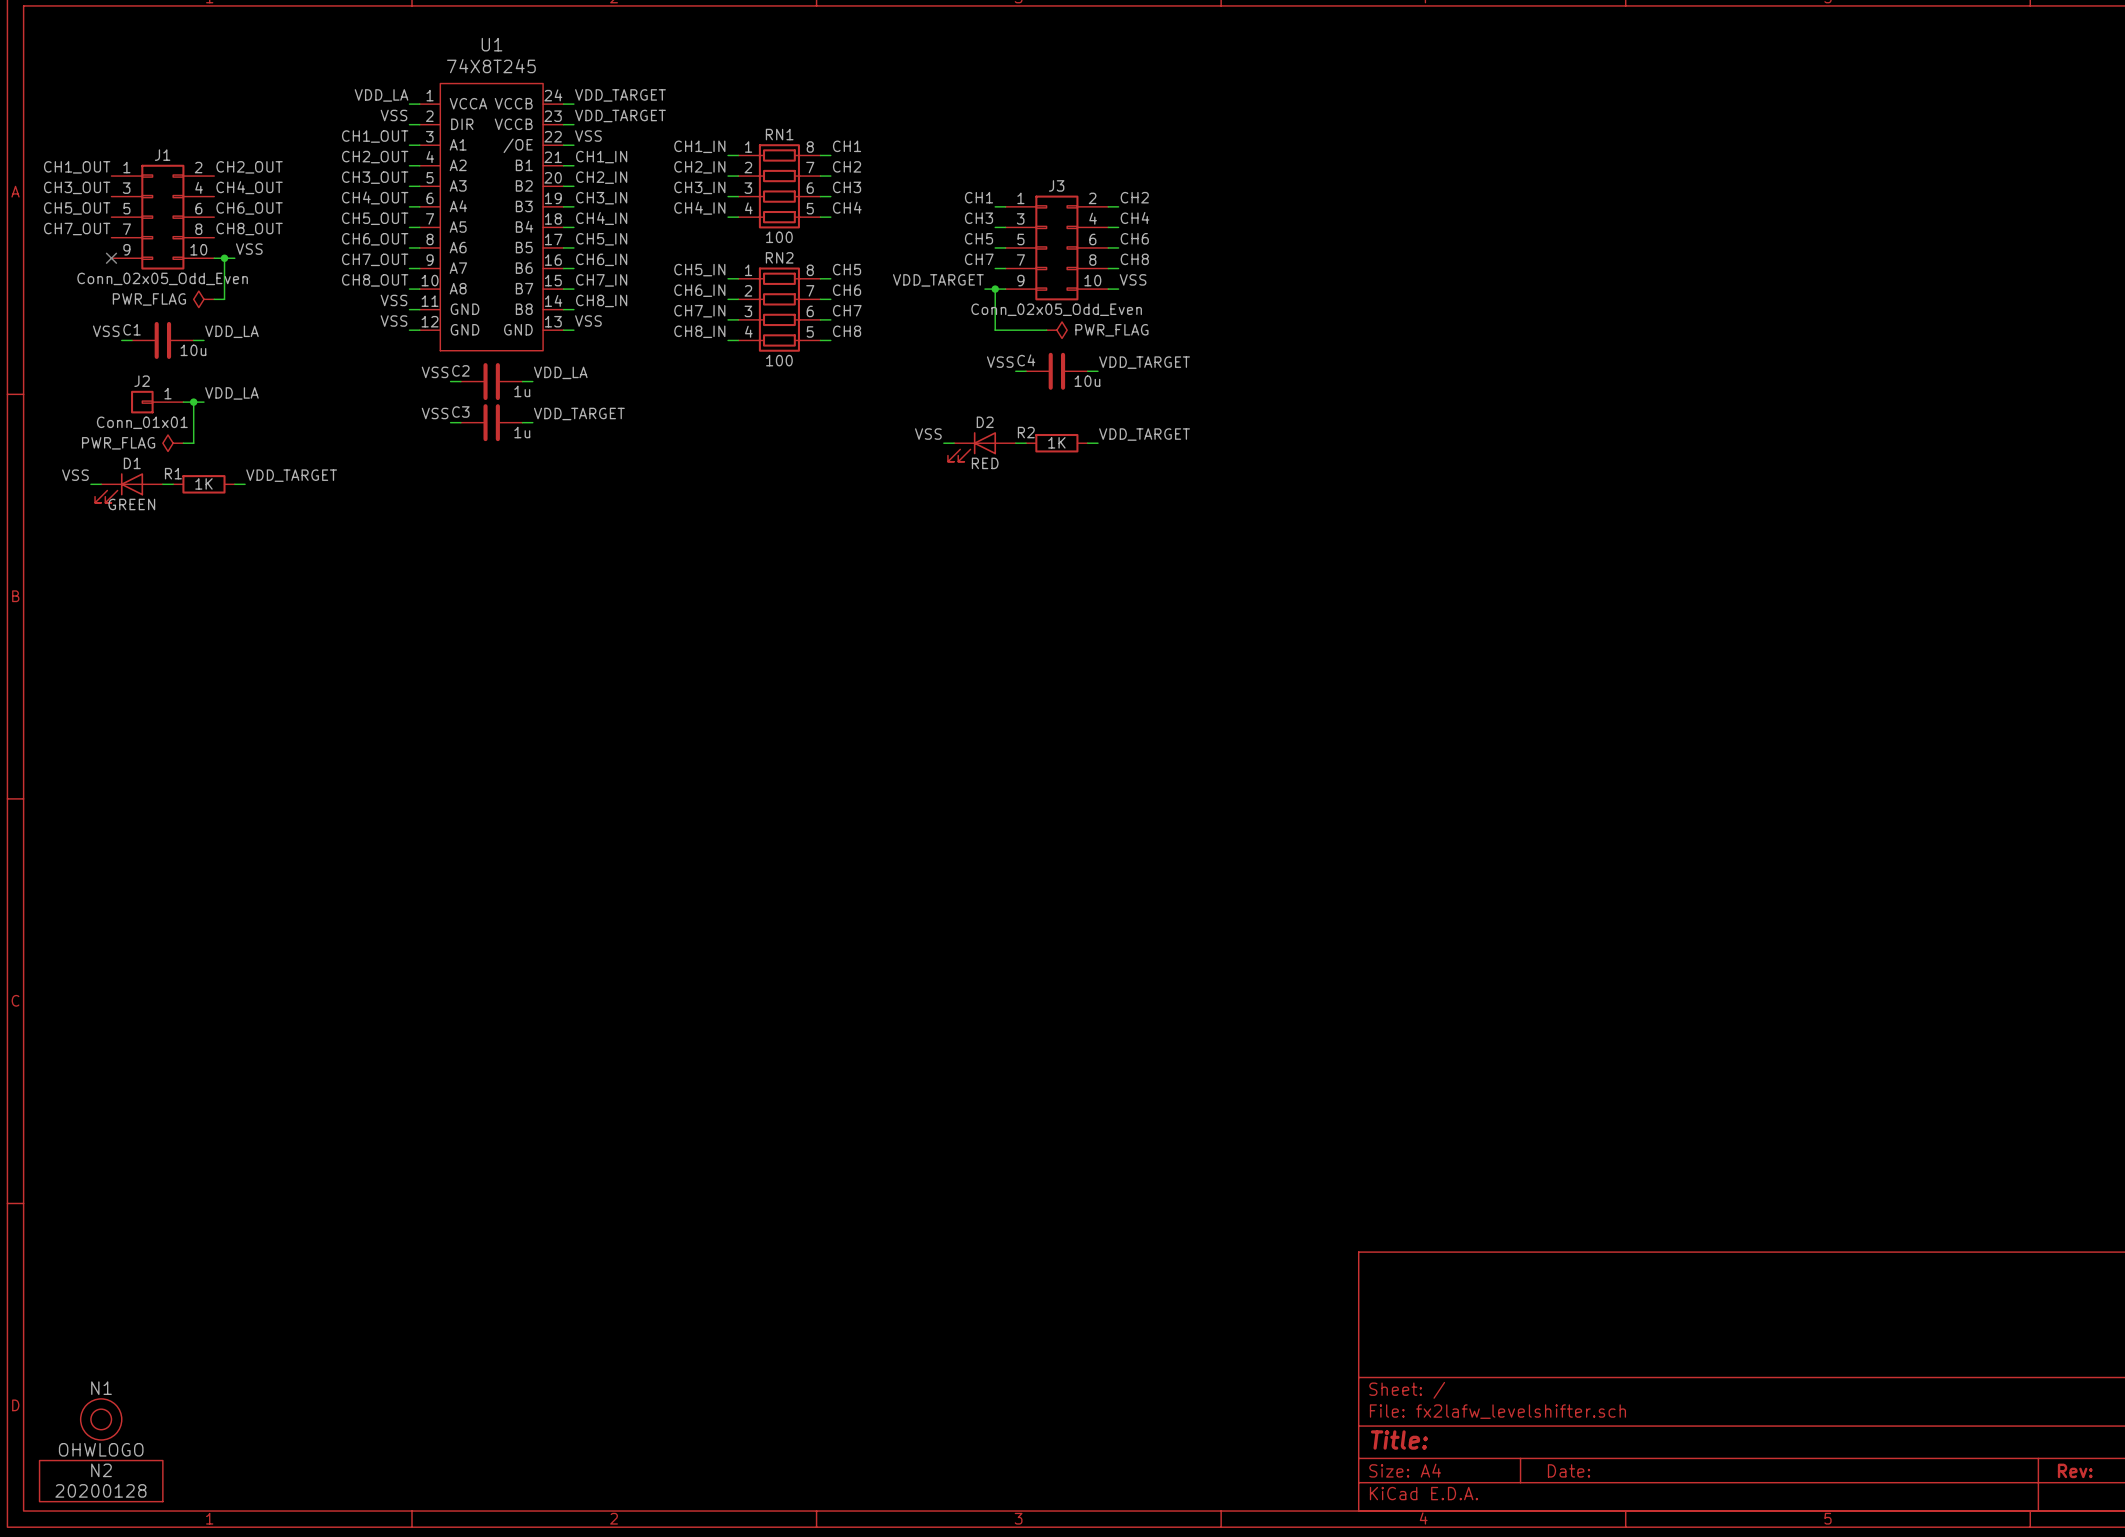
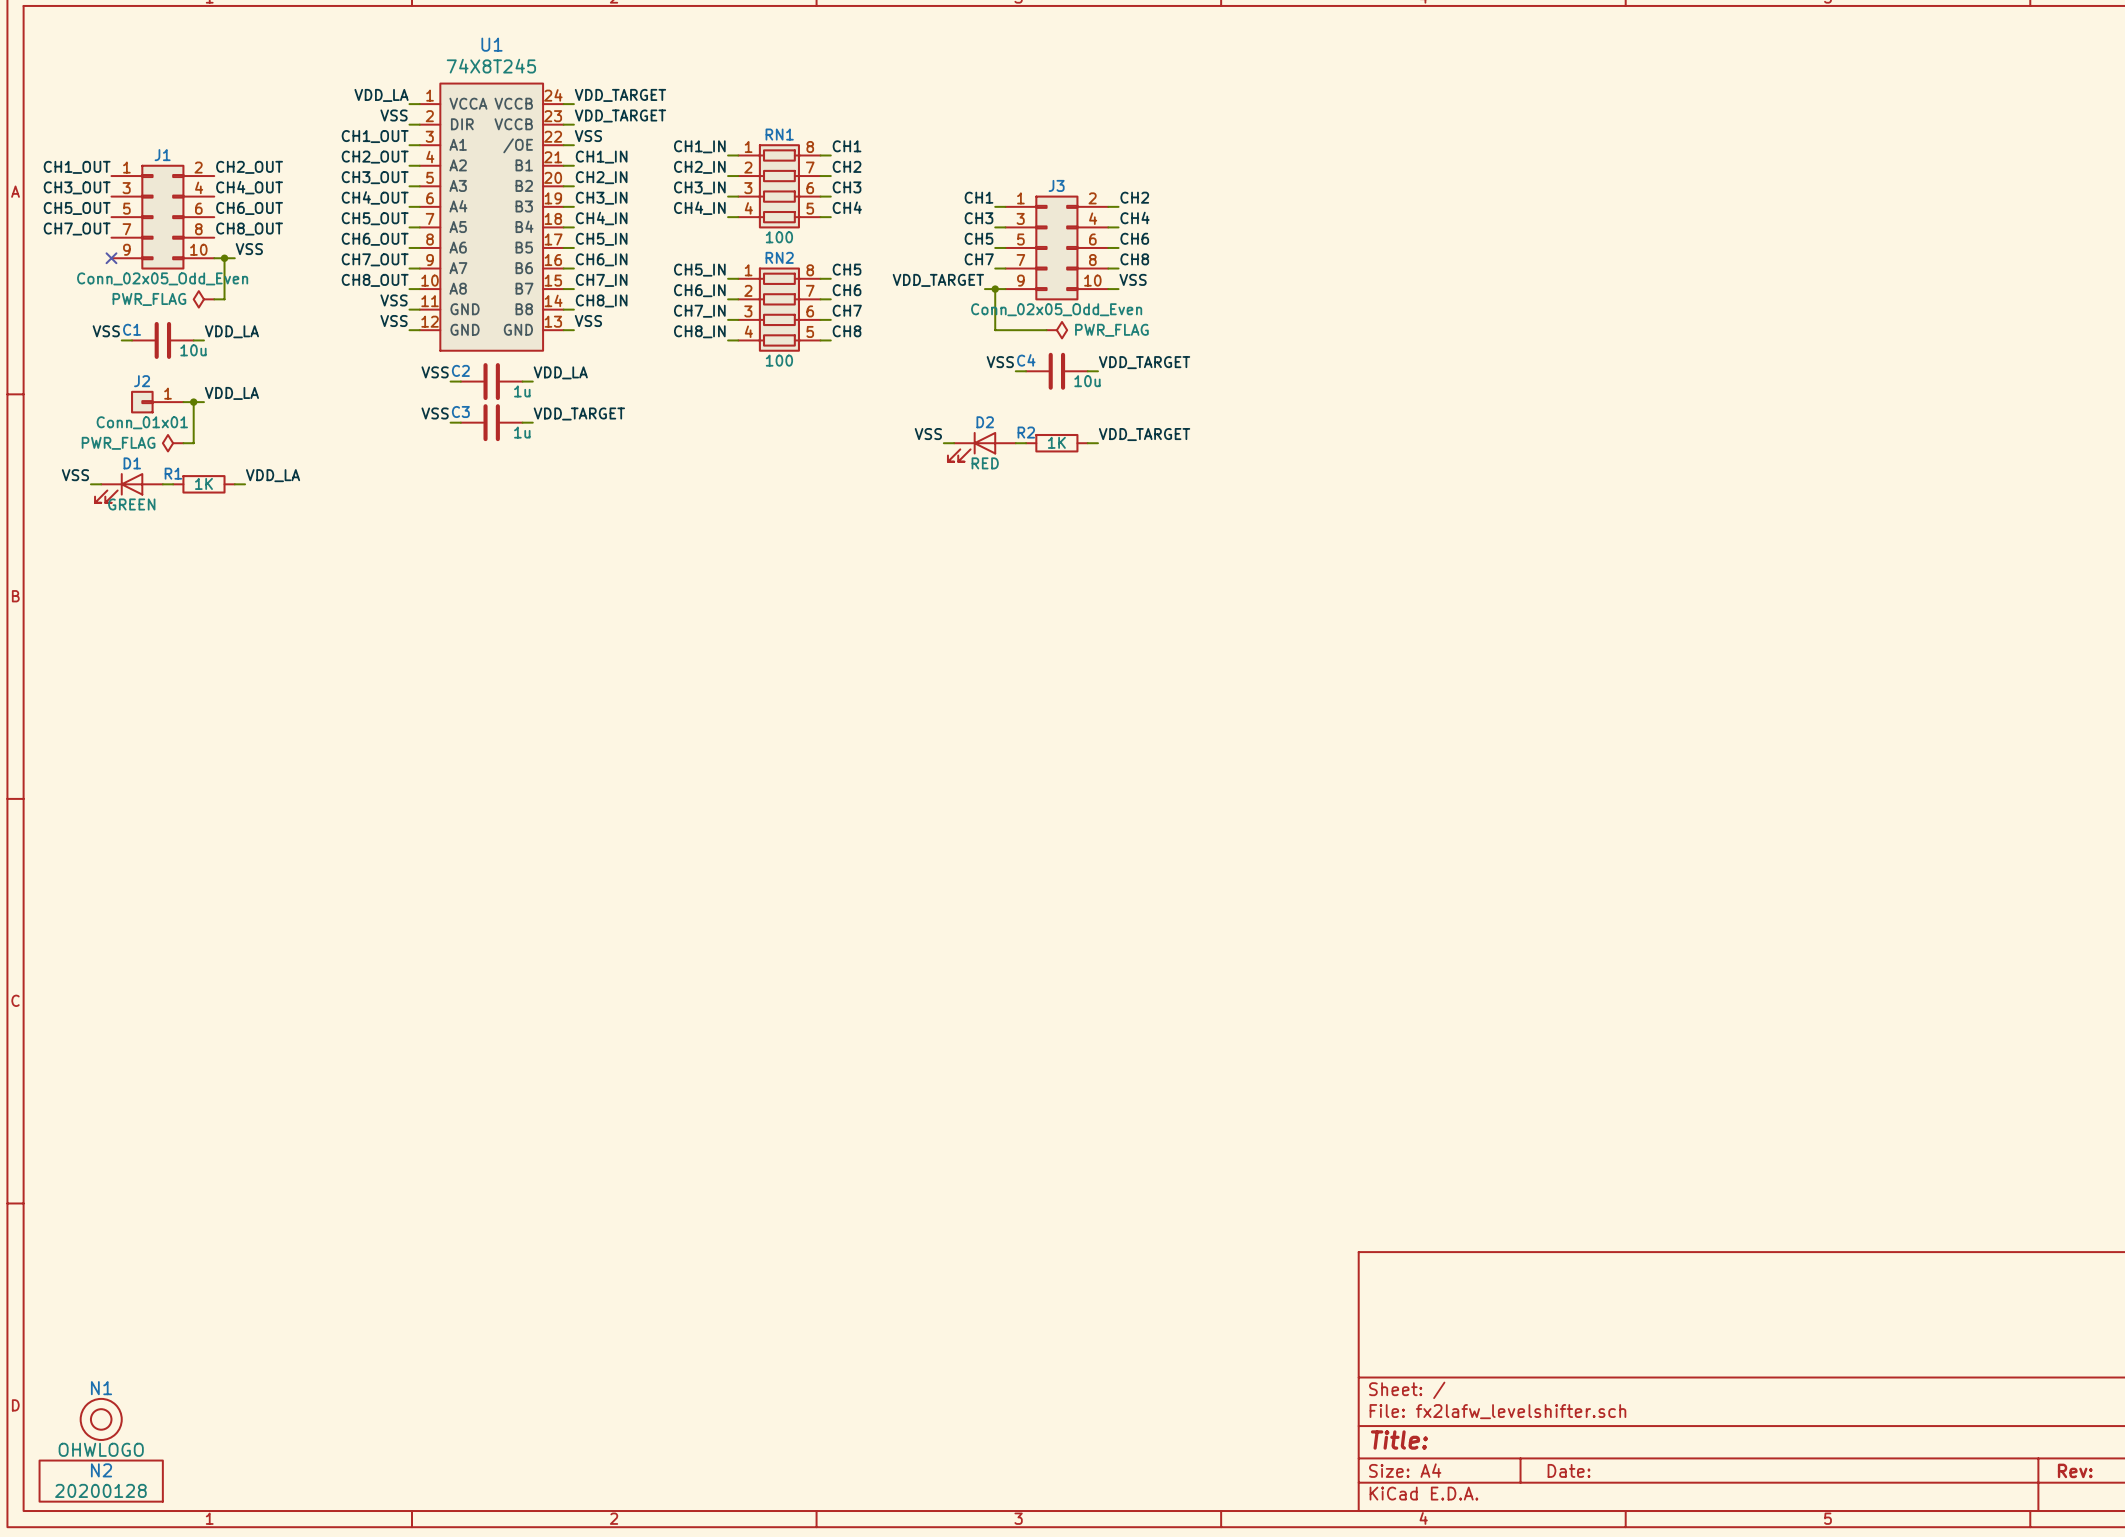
label: VDD_TARGET (291, 475) -> VDD_LA (273, 475)

